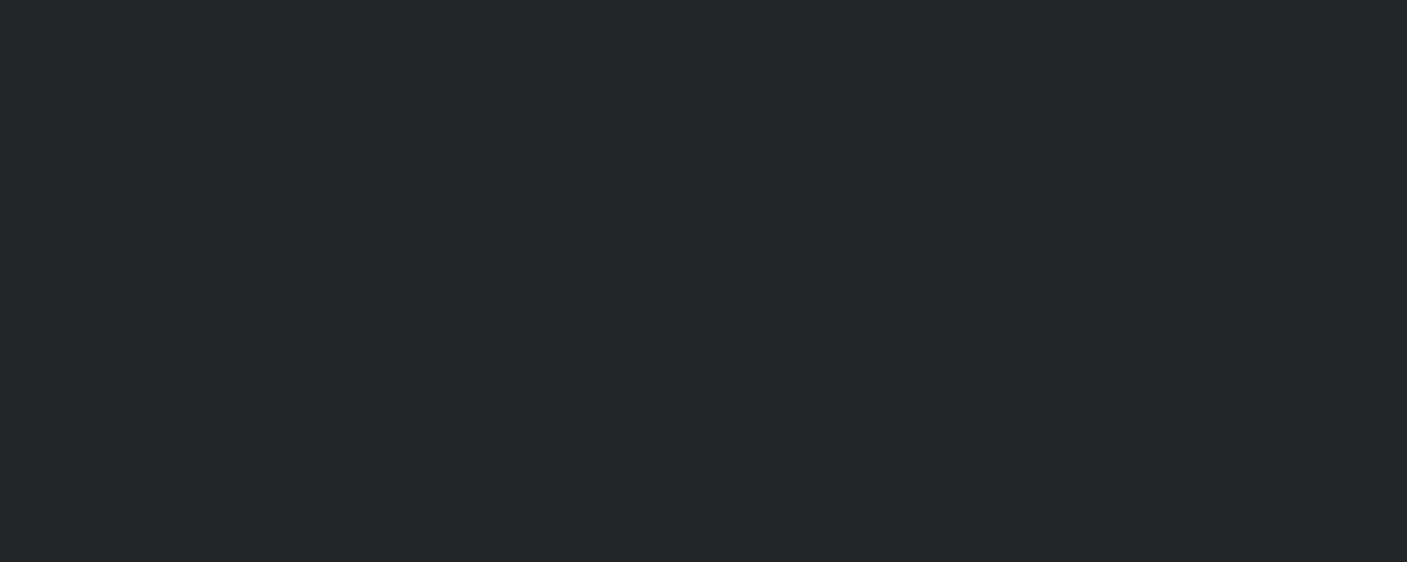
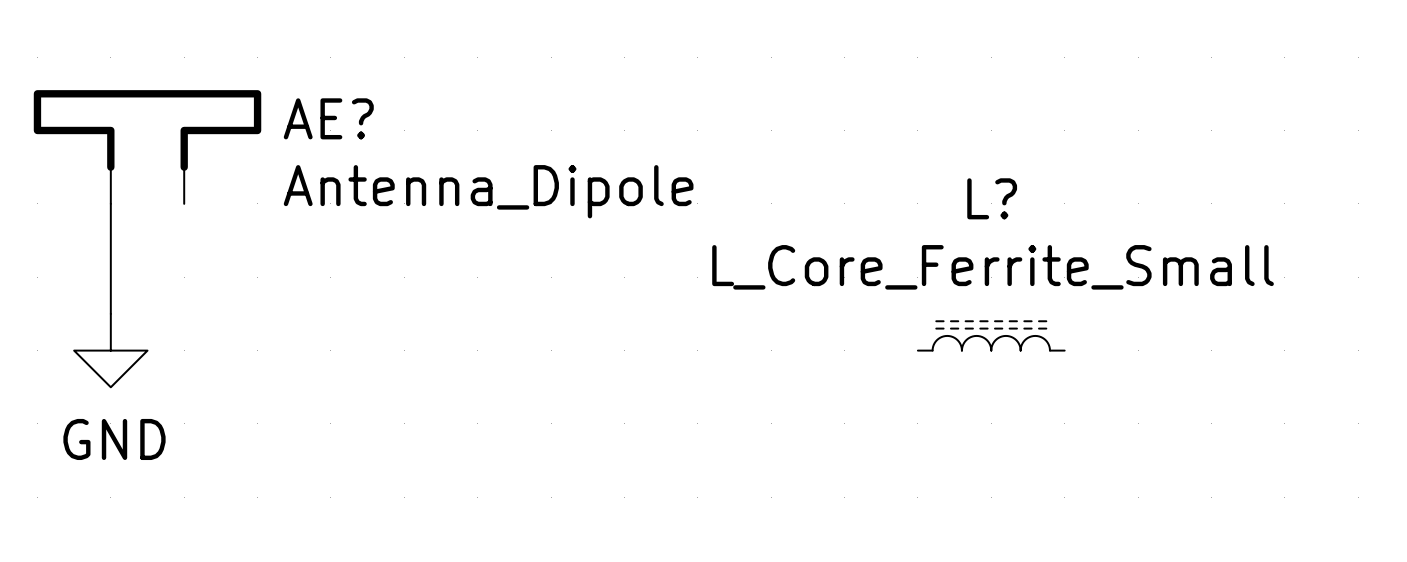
AE?: none -> Antenna_Dipole (147, 146)
wire: none -> (110, 203) (110, 313)
L?: none -> L_Core_Ferrite_Small (991, 335)
power symbol: none -> GND (110, 350)

